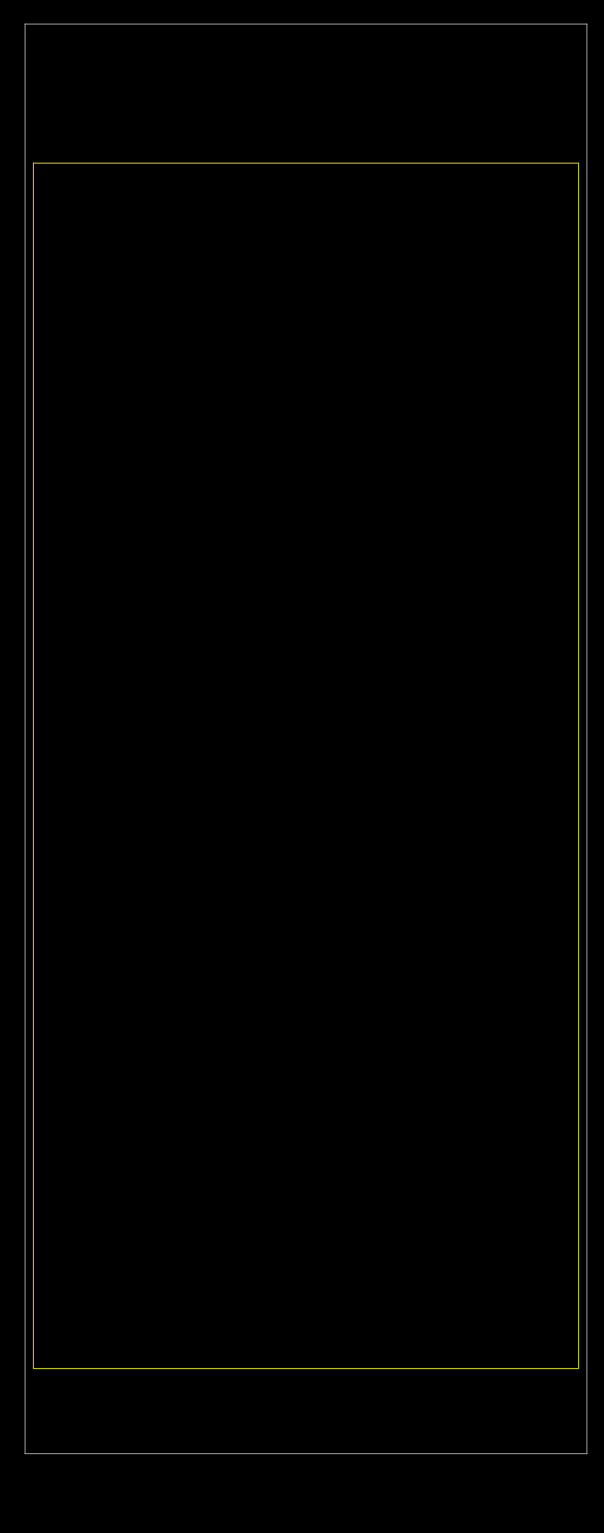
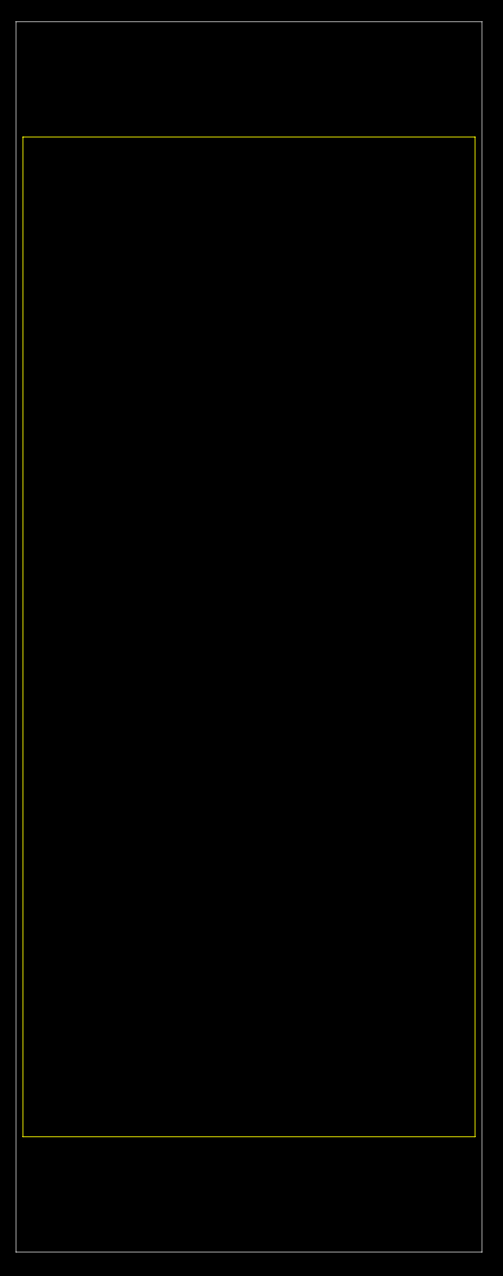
line: (25, 1453) (586, 1453) -> (16, 1207) (16, 1252) (481, 1252) (481, 1207)

